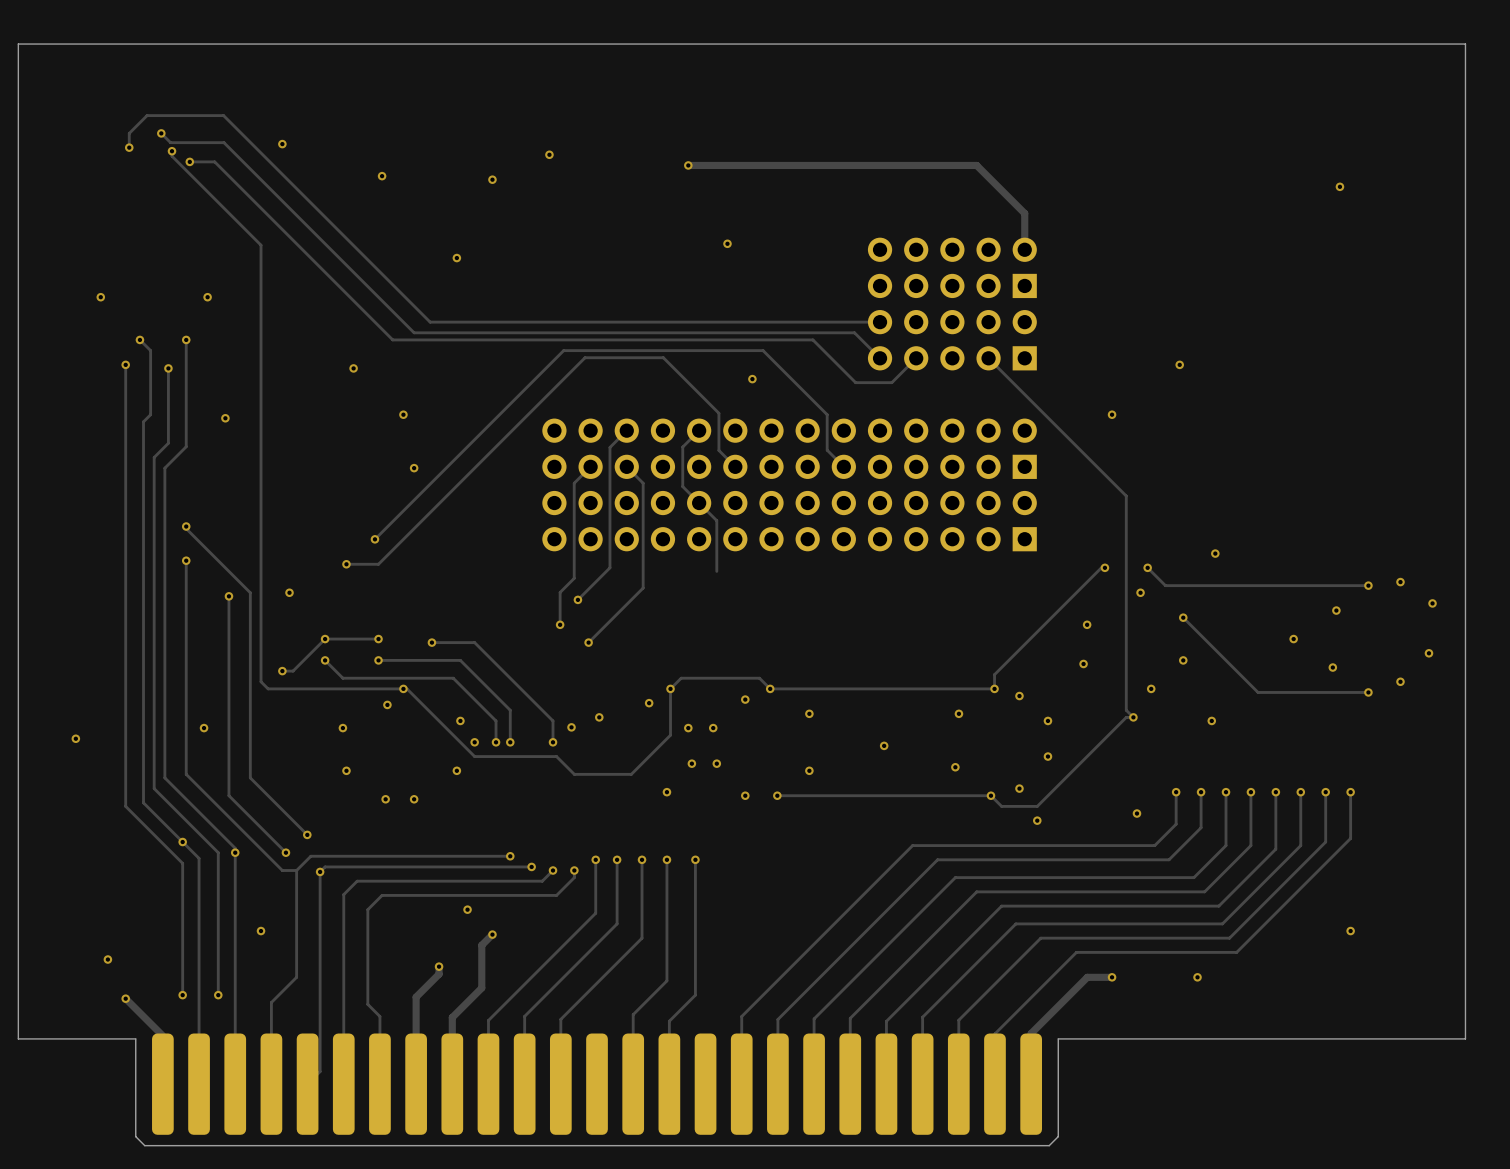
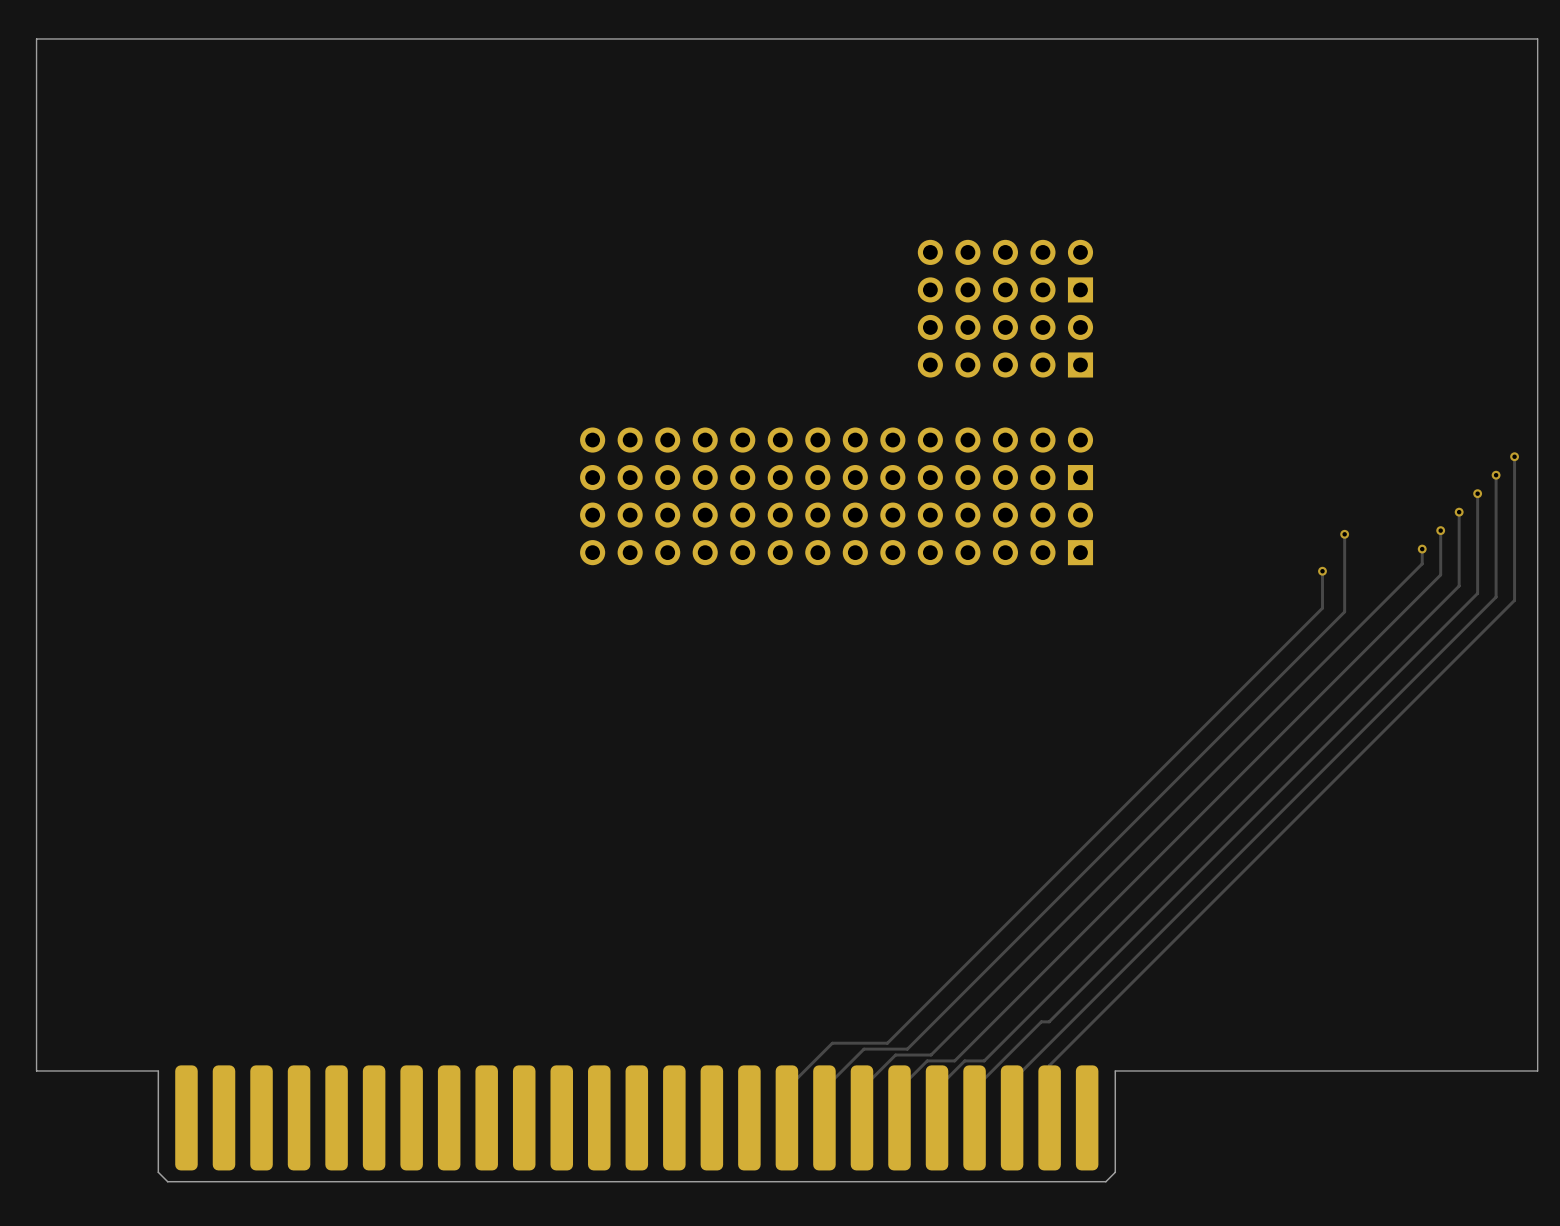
track: (161, 133) (170, 142) (223, 142) (414, 332) (854, 332) (880, 358) -> none
via: (161, 133) -> none
via: (282, 144) -> none
track: (129, 147) (129, 133) (147, 115) (223, 115) (430, 322) (880, 322) -> none
via: (129, 147) -> none
track: (171, 151) (171, 156) (261, 245) (261, 681) (268, 688) (407, 688) (474, 756) (556, 756) (574, 774) (631, 774) (670, 735) (670, 688) (681, 678) (759, 678) (770, 688) (994, 688) (994, 674) (1101, 567) (1104, 567) -> none
via: (171, 151) -> none
via: (549, 154) -> none
track: (189, 161) (214, 161) (392, 339) (812, 339) (855, 382) (891, 382) (916, 358) -> none
via: (189, 161) -> none
track: (688, 165) (976, 165) (1024, 213) (1024, 249) -> none
via: (688, 165) -> none
via: (382, 176) -> none
via: (492, 179) -> none
via: (1339, 186) -> none
via: (727, 243) -> none
via: (456, 258) -> none
via: (100, 297) -> none
via: (207, 297) -> none
track: (139, 339) (150, 350) (150, 414) (143, 421) (143, 802) (199, 858) (199, 1084) -> none
via: (139, 339) -> none
track: (186, 339) (186, 446) (164, 468) (164, 777) (235, 848) (235, 1084) -> none
via: (186, 339) -> none
track: (988, 358) (1126, 496) (1126, 710) (1133, 717) (1126, 717) (1037, 806) (1001, 806) (990, 795) (777, 795) -> none
track: (125, 364) (125, 806) (182, 863) (182, 995) -> none
via: (125, 364) -> none
via: (1179, 364) -> none
track: (168, 368) (168, 443) (154, 457) (154, 788) (218, 852) (218, 995) -> none
via: (168, 368) -> none
via: (353, 368) -> none
via: (752, 379) -> none
via: (403, 414) -> none
via: (1112, 414) -> none
via: (225, 418) -> none
track: (626, 430) (609, 447) (609, 567) (577, 599) -> none
track: (699, 430) (682, 447) (682, 486) (716, 520) (716, 571) -> none
via: none -> (1514, 456)
via: none -> (1496, 475)
track: (590, 466) (574, 483) (574, 578) (560, 592) (560, 624) -> none
track: (626, 466) (643, 483) (643, 588) (588, 642) -> none
track: (735, 466) (718, 450) (718, 413) (663, 357) (585, 357) (378, 564) (346, 564) -> none
track: (843, 466) (827, 450) (827, 414) (763, 350) (563, 350) (374, 539) -> none
via: (414, 468) -> none
via: none -> (1477, 493)
via: none -> (1459, 512)
via: none -> (1440, 530)
via: none -> (1344, 534)
track: (186, 526) (250, 592) (250, 777) (307, 834) -> none
via: (186, 526) -> none
via: none -> (1422, 549)
via: (374, 539) -> none
via: (1215, 553) -> none
via: none -> (1322, 571)
track: (186, 560) (186, 774) (282, 870) (296, 870) -> none
via: (186, 560) -> none
via: (346, 564) -> none
via: (1104, 567) -> none
track: (1147, 567) (1165, 585) (1368, 585) -> none
via: (1147, 567) -> none
via: (1400, 582) -> none
via: (1368, 585) -> none
via: (289, 592) -> none
via: (1140, 592) -> none
track: (228, 596) (228, 795) (285, 852) -> none
via: (228, 596) -> none
via: (577, 599) -> none
via: (1432, 603) -> none
via: (1336, 610) -> none
track: (1183, 617) (1258, 692) (1368, 692) -> none
via: (1183, 617) -> none
via: (560, 624) -> none
via: (1087, 624) -> none
via: (325, 639) -> none
track: (378, 639) (325, 639) (293, 671) (282, 671) -> none
via: (378, 639) -> none
via: (1293, 639) -> none
track: (431, 642) (474, 642) (553, 720) (553, 742) -> none
via: (431, 642) -> none
via: (588, 642) -> none
via: (1428, 653) -> none
track: (325, 660) (342, 678) (453, 678) (496, 720) (496, 742) -> none
via: (325, 660) -> none
track: (378, 660) (460, 660) (510, 710) (510, 742) -> none
via: (378, 660) -> none
via: (1183, 660) -> none
via: (1083, 663) -> none
via: (1332, 667) -> none
via: (282, 671) -> none
via: (1400, 681) -> none
via: (403, 688) -> none
via: (670, 688) -> none
via: (770, 688) -> none
via: (994, 688) -> none
via: (1151, 688) -> none
via: (1368, 692) -> none
via: (1019, 696) -> none
via: (745, 699) -> none
via: (649, 703) -> none
via: (387, 704) -> none
via: (809, 713) -> none
via: (958, 713) -> none
via: (599, 717) -> none
via: (1133, 717) -> none
via: (460, 720) -> none
via: (1047, 720) -> none
via: (1211, 720) -> none
via: (571, 727) -> none
via: (204, 728) -> none
via: (342, 728) -> none
via: (688, 728) -> none
via: (713, 728) -> none
via: (75, 738) -> none
via: (474, 742) -> none
via: (496, 742) -> none
via: (510, 742) -> none
via: (553, 742) -> none
via: (884, 745) -> none
via: (1047, 756) -> none
via: (691, 763) -> none
via: (716, 763) -> none
via: (955, 767) -> none
via: (346, 770) -> none
via: (456, 770) -> none
via: (809, 770) -> none
via: (1019, 788) -> none
via: (666, 792) -> none
track: (1176, 792) (1176, 824) (1154, 845) (912, 845) (741, 1016) (741, 1055) -> (1322, 571) (1322, 608) (887, 1043) (832, 1043) (786, 1088)
via: (1176, 792) -> none
track: (1201, 792) (1201, 827) (1169, 859) (937, 859) (777, 1019) (777, 1055) -> (1344, 534) (1344, 611) (907, 1049) (863, 1049) (824, 1088)
via: (1201, 792) -> none
track: (1226, 792) (1226, 845) (1193, 877) (955, 877) (814, 1018) (814, 1055) -> (1422, 549) (1422, 563) (931, 1055) (895, 1055) (861, 1088)
via: (1226, 792) -> none
track: (1250, 792) (1250, 845) (1204, 891) (976, 891) (850, 1018) (850, 1055) -> (1440, 530) (1440, 574) (954, 1060) (927, 1060) (899, 1088)
via: (1250, 792) -> none
track: (1275, 792) (1275, 849) (1218, 906) (1001, 906) (886, 1021) (886, 1055) -> (1459, 512) (1459, 586) (984, 1060) (964, 1060) (937, 1088)
via: (1275, 792) -> none
track: (1300, 792) (1300, 845) (1222, 923) (1015, 923) (922, 1017) (922, 1055) -> (1477, 493) (1477, 593) (1049, 1021) (1041, 1021) (974, 1088)
via: (1300, 792) -> none
track: (1325, 792) (1325, 842) (1229, 938) (1040, 938) (958, 1020) (958, 1048) -> (1496, 475) (1496, 597) (1012, 1081)
via: (1325, 792) -> none
track: (1350, 792) (1350, 838) (1236, 952) (1076, 952) (994, 1033) -> (1514, 456) (1514, 600) (1049, 1065)
via: (1350, 792) -> none
via: (745, 795) -> none
via: (777, 795) -> none
via: (990, 795) -> none
via: (385, 799) -> none
via: (414, 799) -> none
via: (1136, 813) -> none
via: (1037, 820) -> none
via: (307, 834) -> none
via: (182, 842) -> none
via: (235, 852) -> none
via: (285, 852) -> none
track: (510, 856) (310, 856) (296, 870) -> none
via: (510, 856) -> none
track: (595, 859) (595, 913) (488, 1020) (488, 1084) -> none
via: (595, 859) -> none
track: (617, 859) (617, 923) (524, 1016) (524, 1084) -> none
via: (617, 859) -> none
track: (642, 859) (642, 938) (560, 1019) (560, 1084) -> none
via: (642, 859) -> none
track: (666, 859) (666, 980) (633, 1014) (633, 1084) -> none
via: (666, 859) -> none
track: (695, 859) (695, 995) (669, 1021) (669, 1084) -> none
via: (695, 859) -> none
track: (531, 866) (325, 866) (320, 871) (320, 1071) (307, 1084) -> none
via: (531, 866) -> none
track: (296, 870) (296, 977) (271, 1002) (271, 1084) -> none
track: (553, 870) (542, 881) (357, 881) (343, 894) (343, 1084) -> none
via: (553, 870) -> none
track: (574, 870) (574, 877) (556, 895) (382, 895) (367, 909) (367, 1004) (379, 1016) (379, 1084) -> none
via: (574, 870) -> none
via: (320, 871) -> none
via: (467, 909) -> none
via: (261, 931) -> none
via: (1350, 931) -> none
track: (492, 934) (481, 945) (481, 988) (452, 1017) (452, 1084) -> none
via: (492, 934) -> none
via: (107, 959) -> none
track: (439, 966) (439, 974) (416, 997) (416, 1084) -> none
via: (439, 966) -> none
track: (1112, 977) (1087, 977) (1031, 1033) (1031, 1084) -> none
via: (1112, 977) -> none
via: (1197, 977) -> none
via: (182, 995) -> none
via: (218, 995) -> none
track: (125, 998) (162, 1035) (162, 1084) -> none
via: (125, 998) -> none

